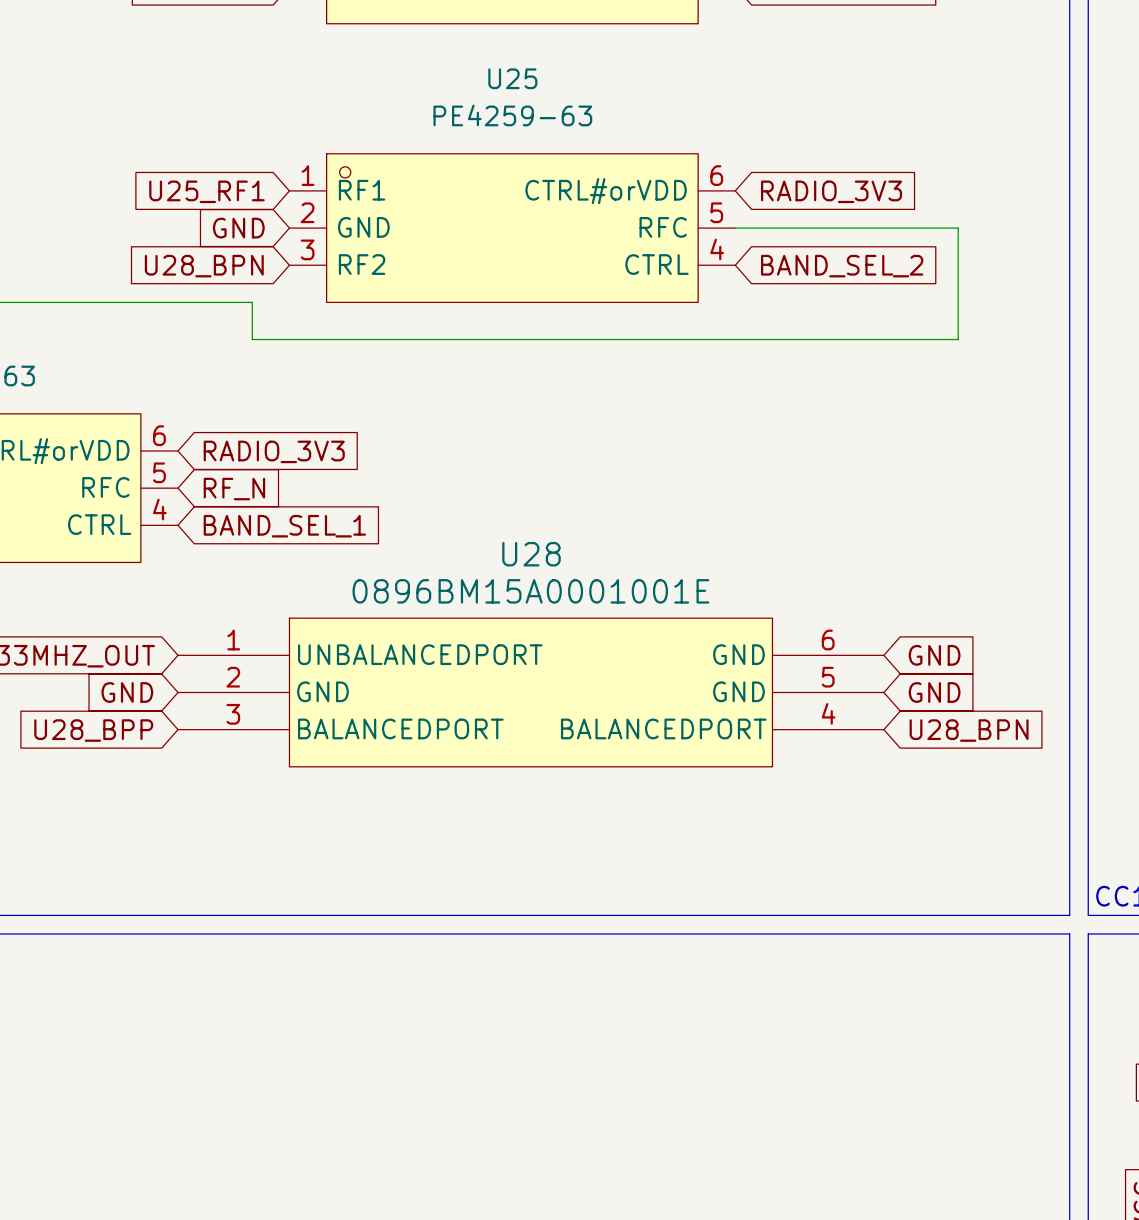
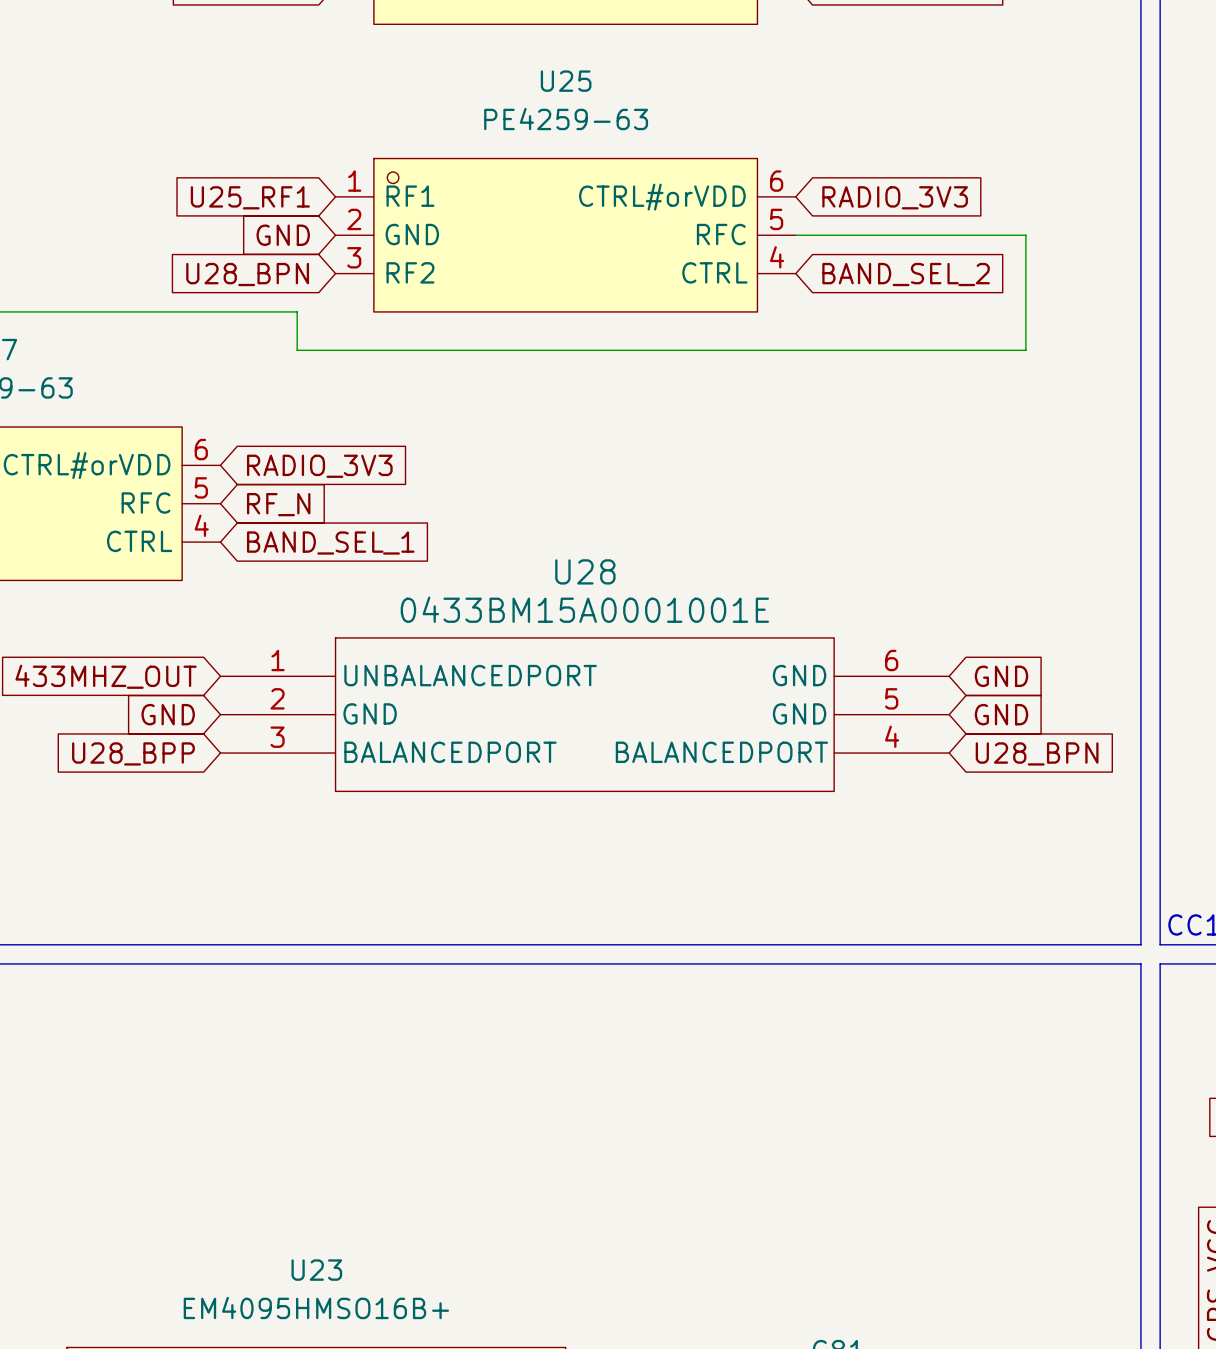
U28 value: 0896BM15A0001001E (530, 591) -> 0433BM15A0001001E (584, 609)
U28 symbol: [178, 618, 884, 767] -> [220, 637, 950, 792]

